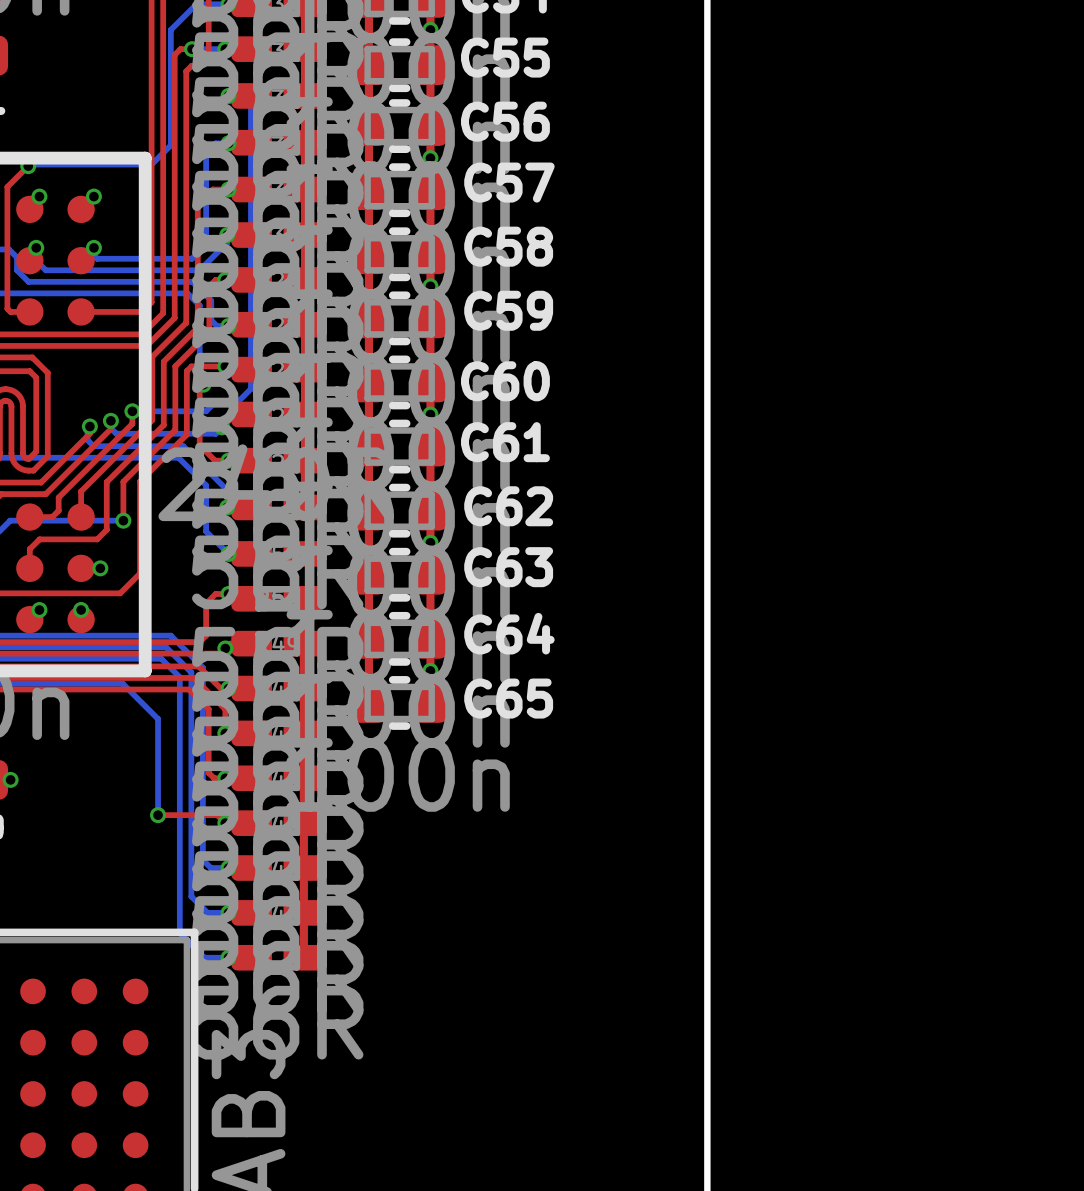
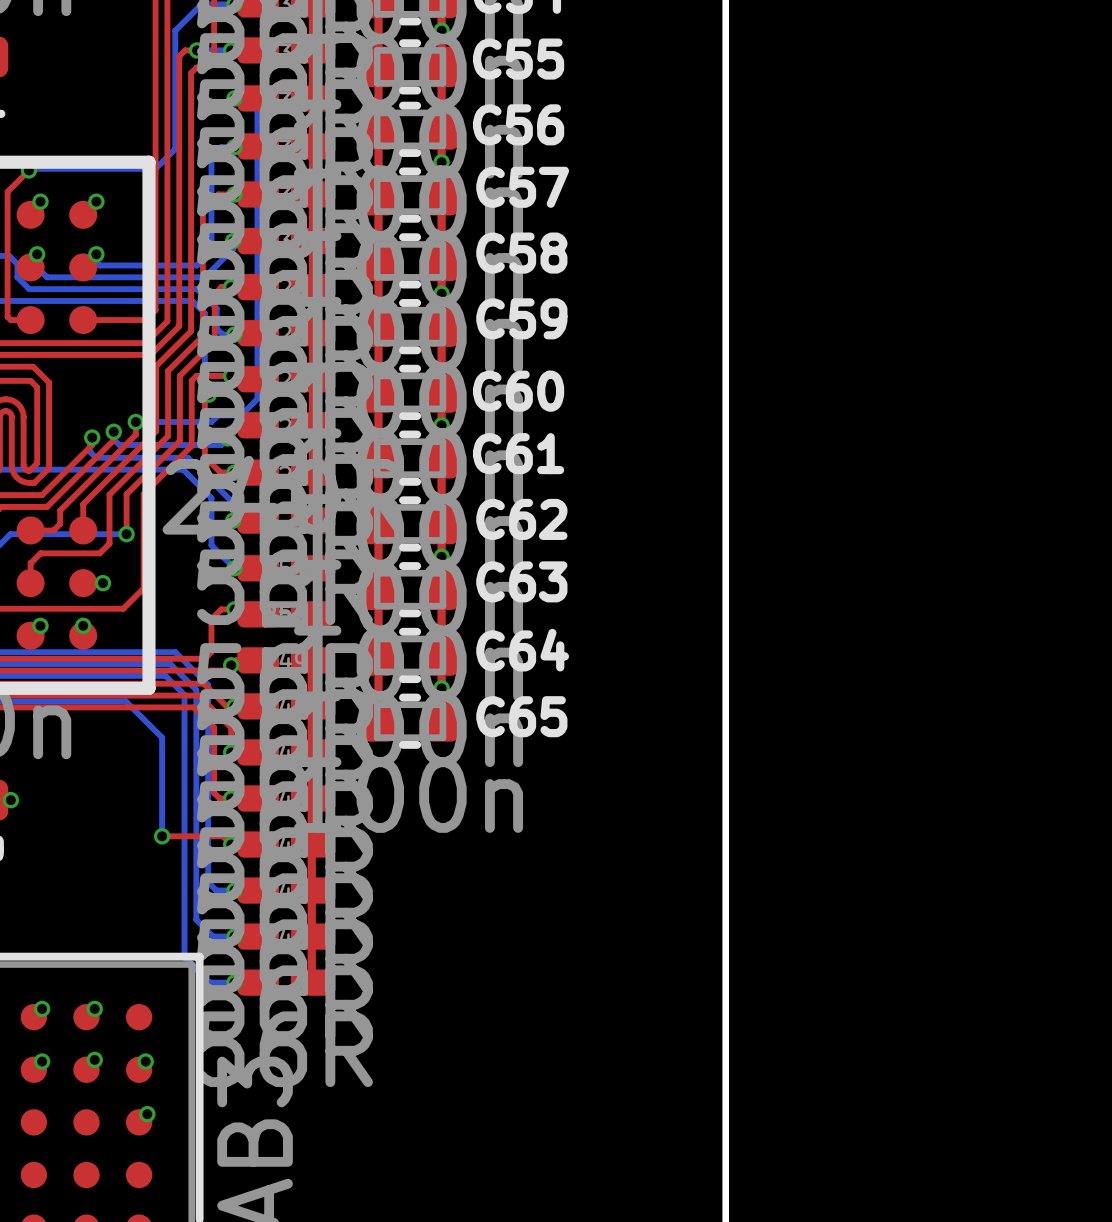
via: none -> (42, 1008)
via: none -> (94, 1008)
via: none -> (94, 1059)
via: none -> (42, 1061)
via: none -> (145, 1061)
via: none -> (147, 1114)

